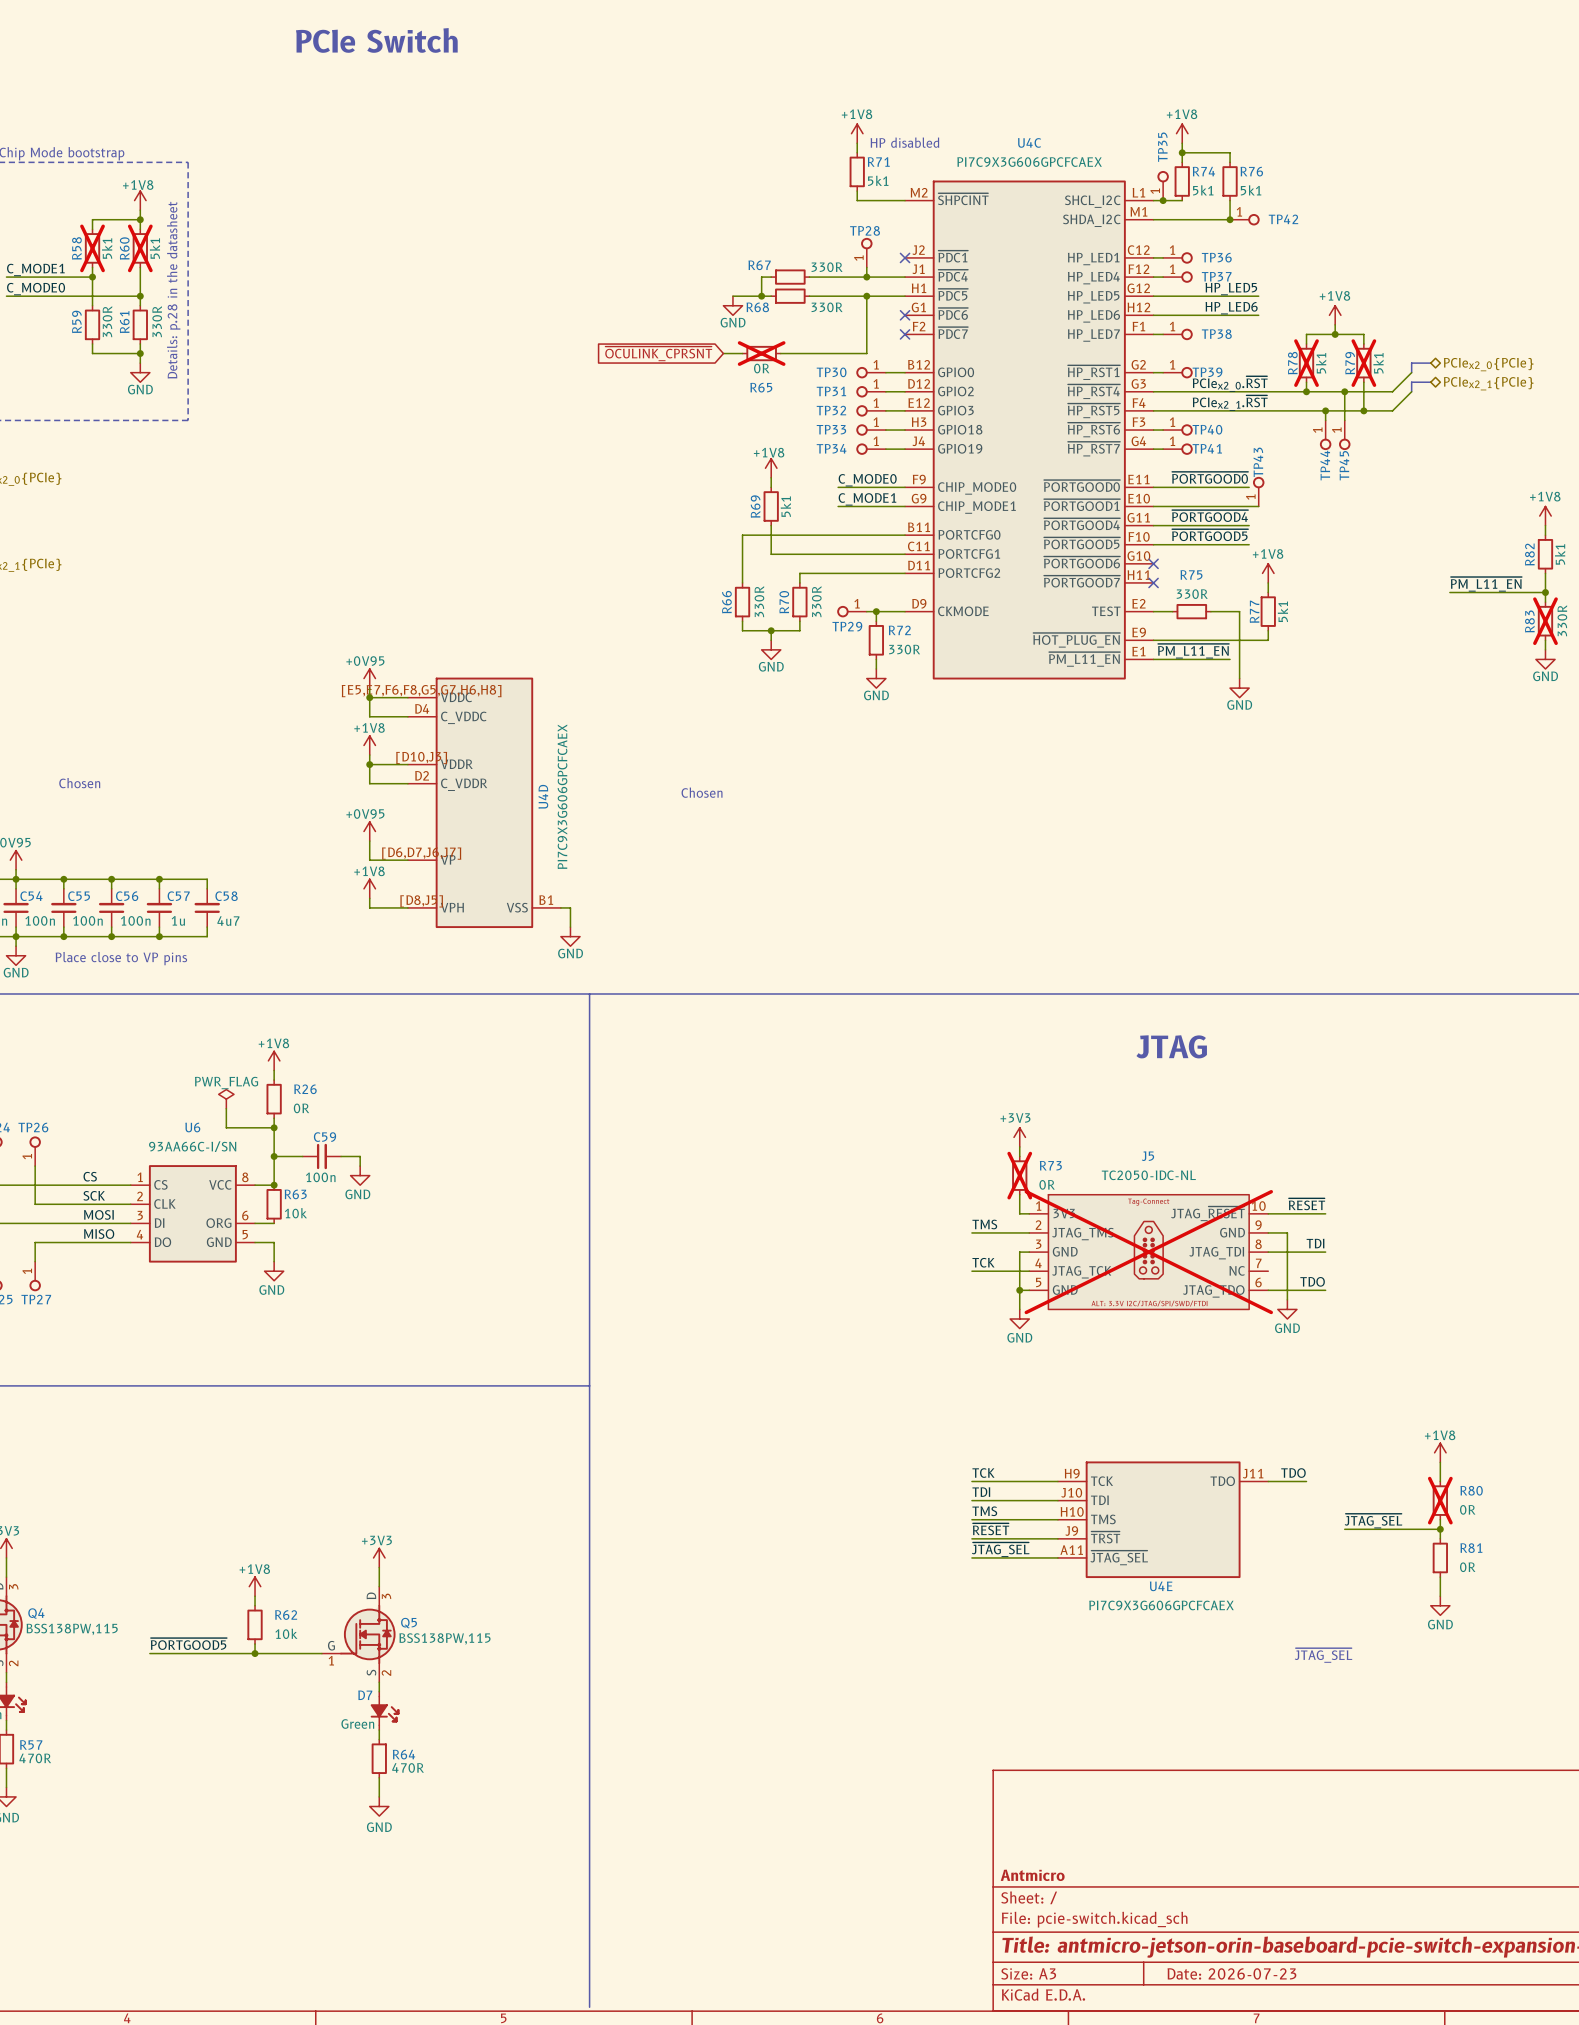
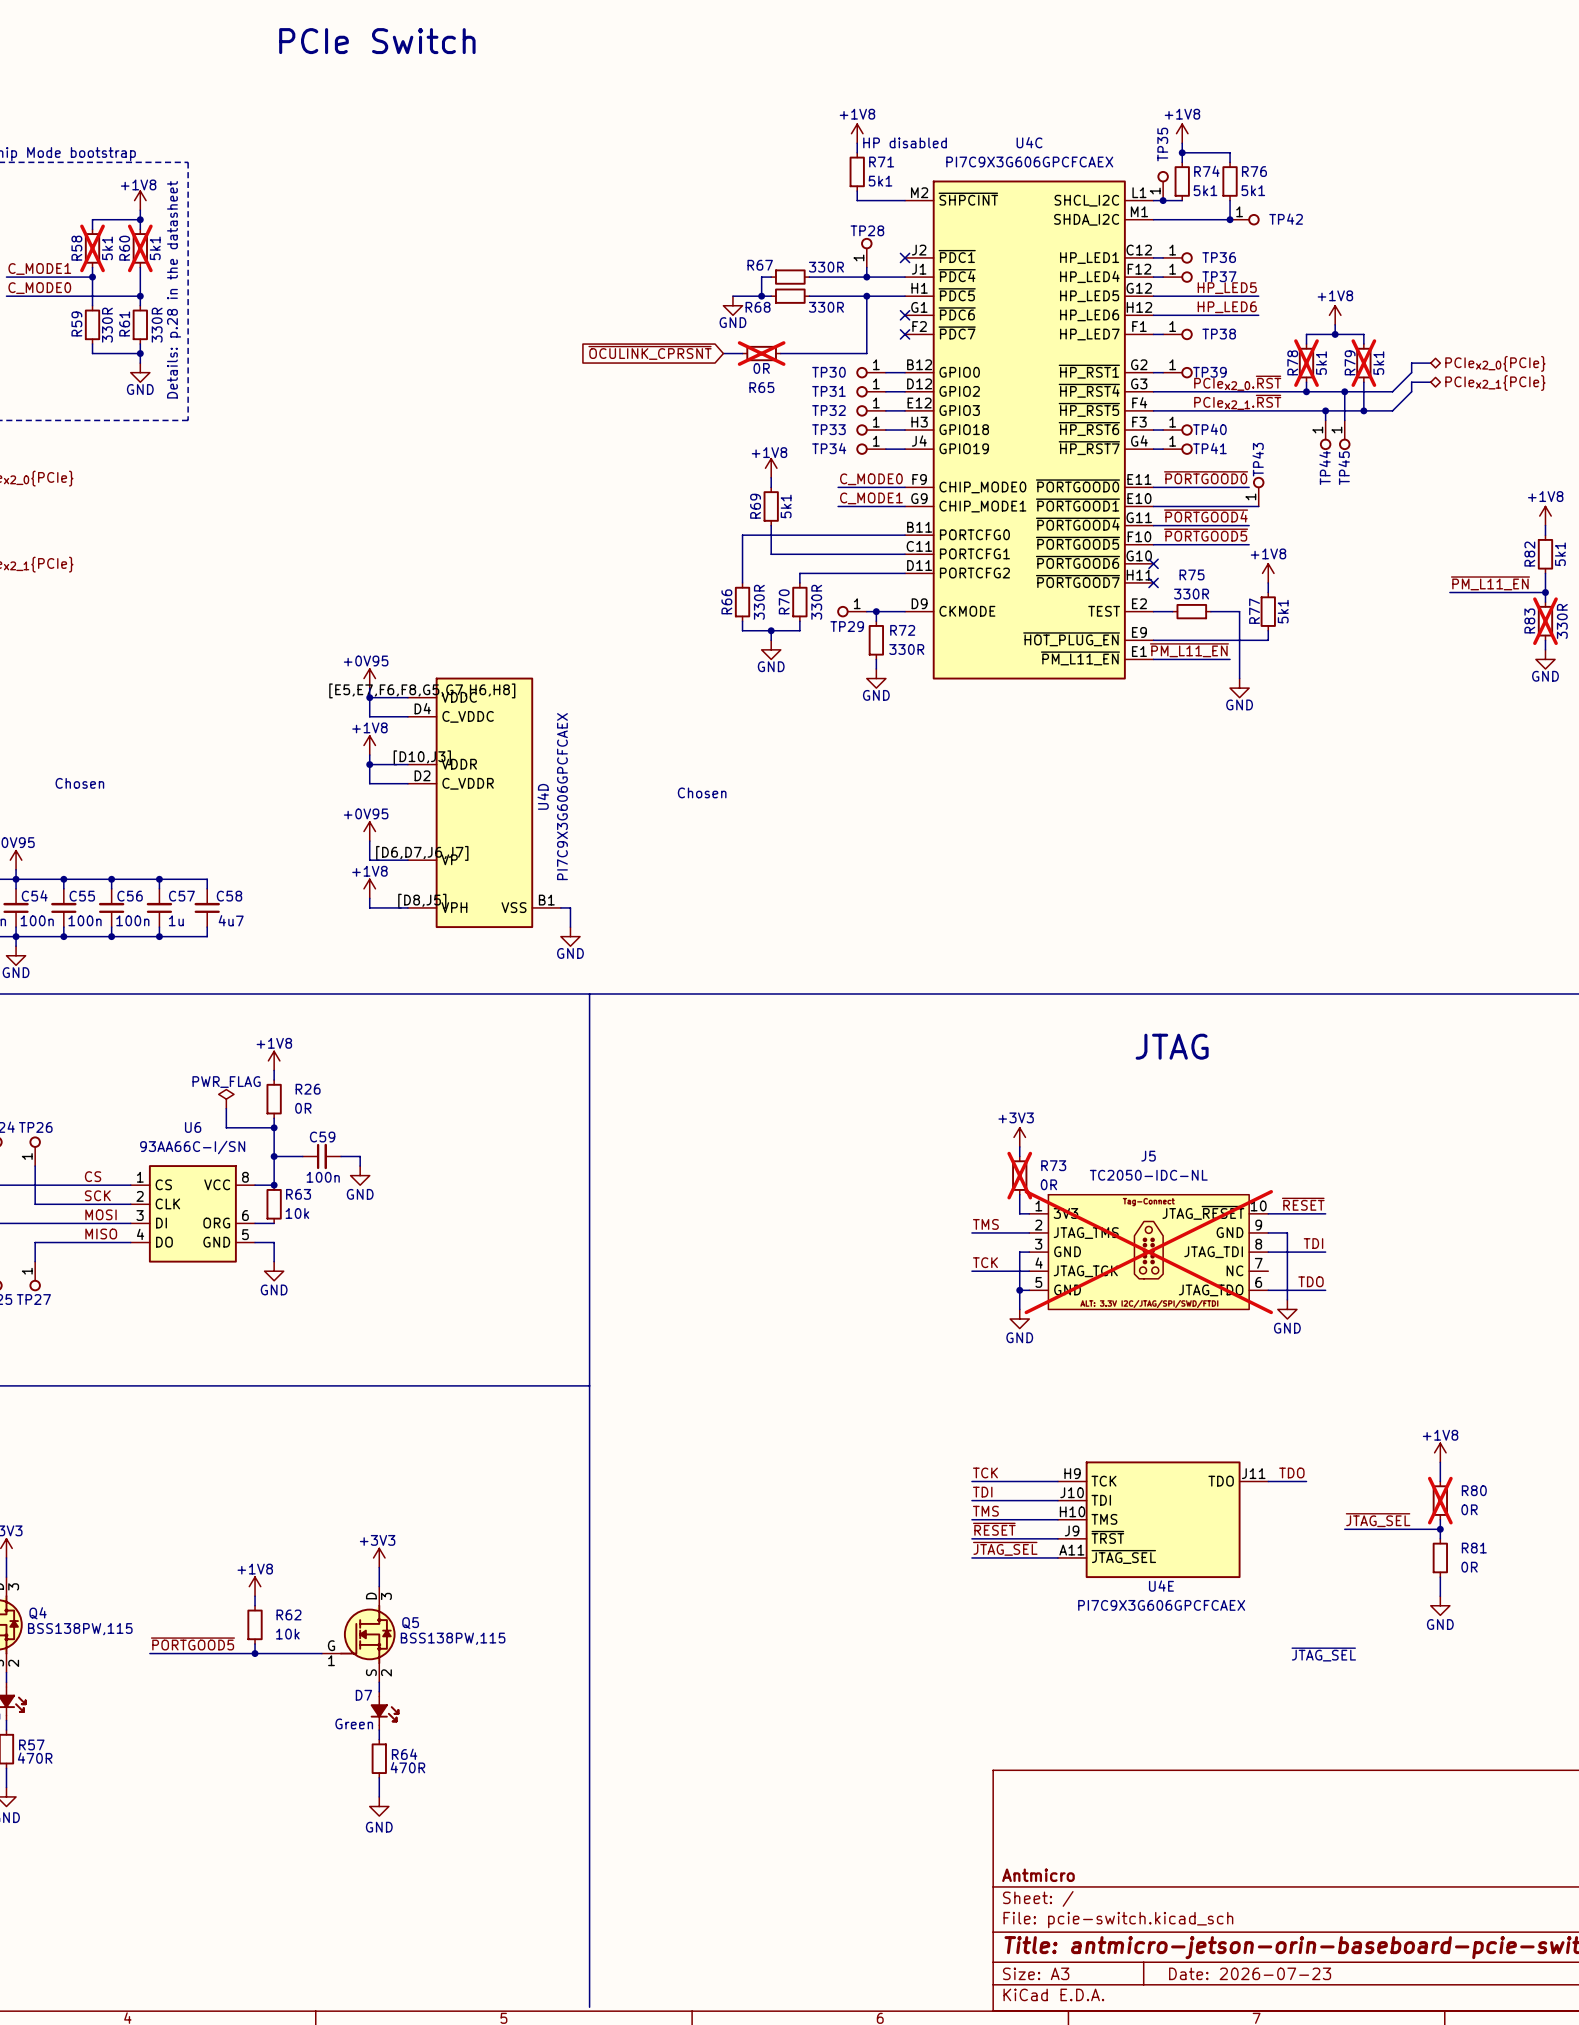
text: Place close to VP pins (121, 958) -> none

